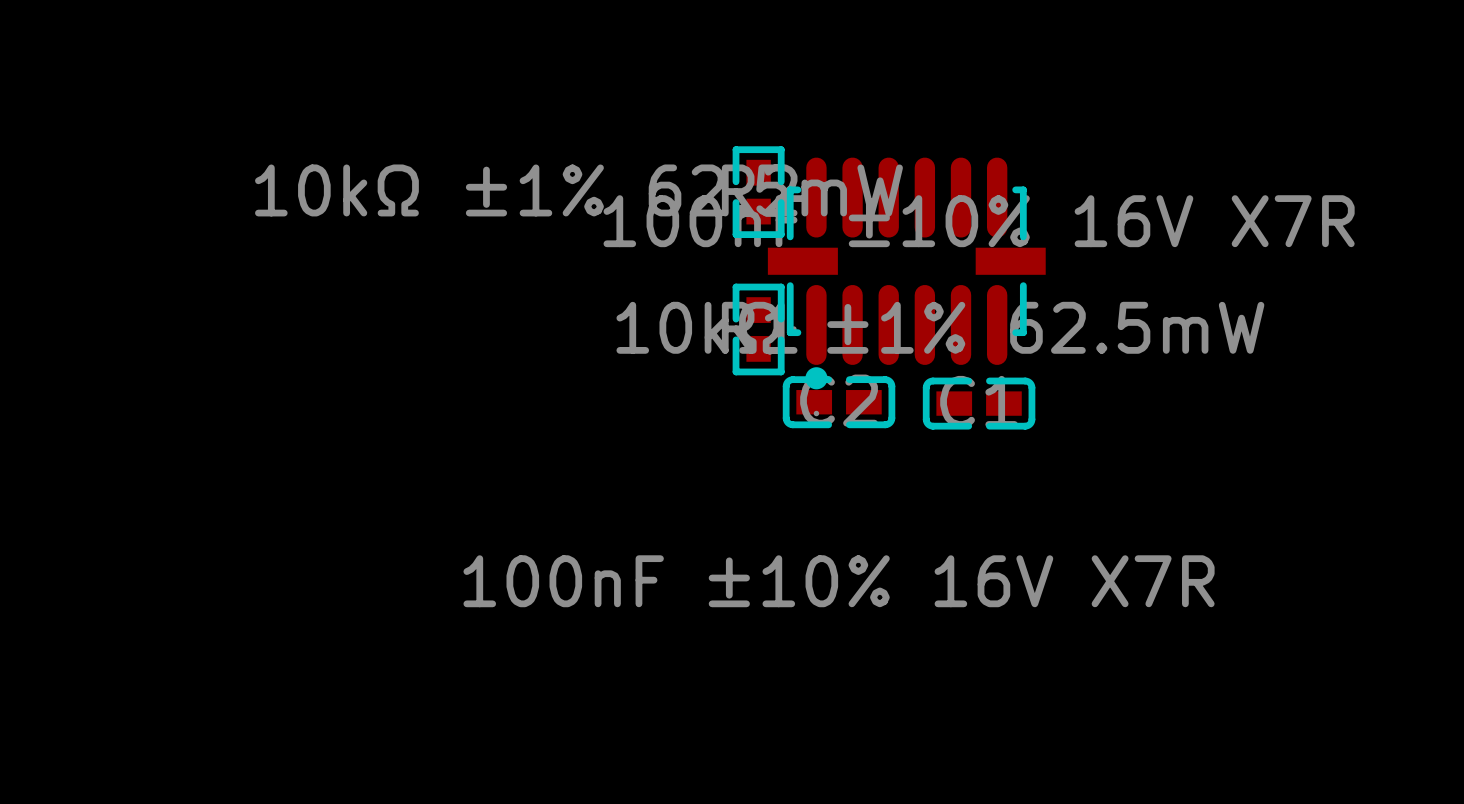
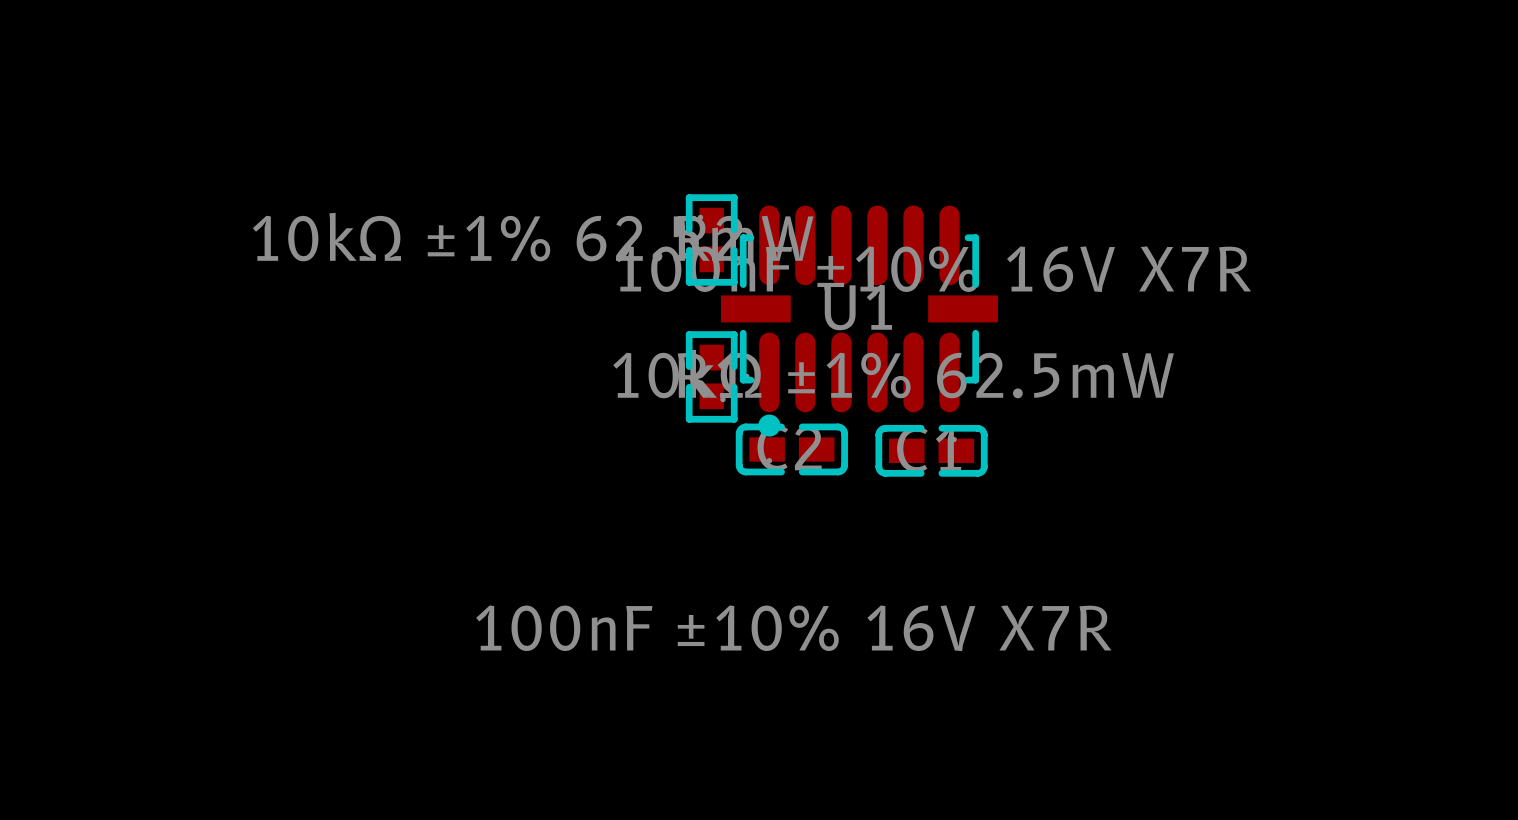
U1 name: none -> U1 (857, 307)

